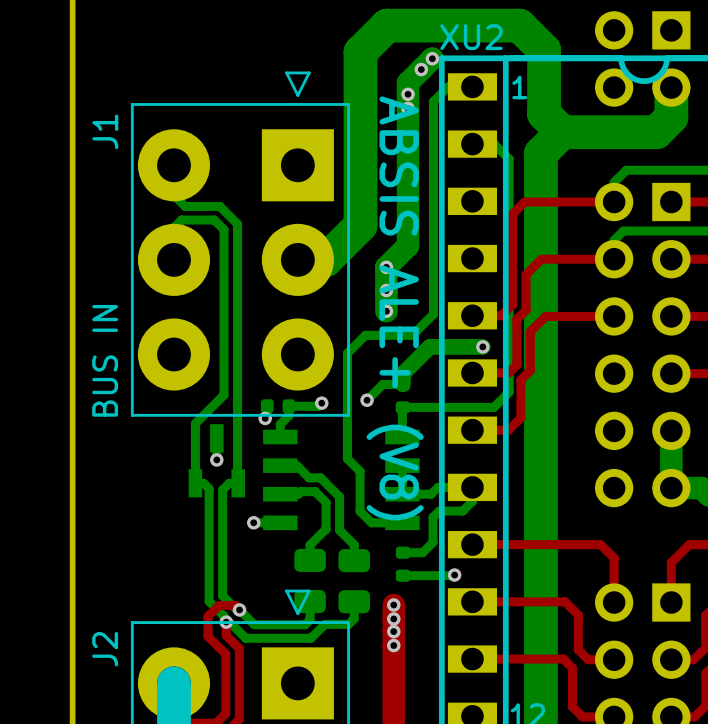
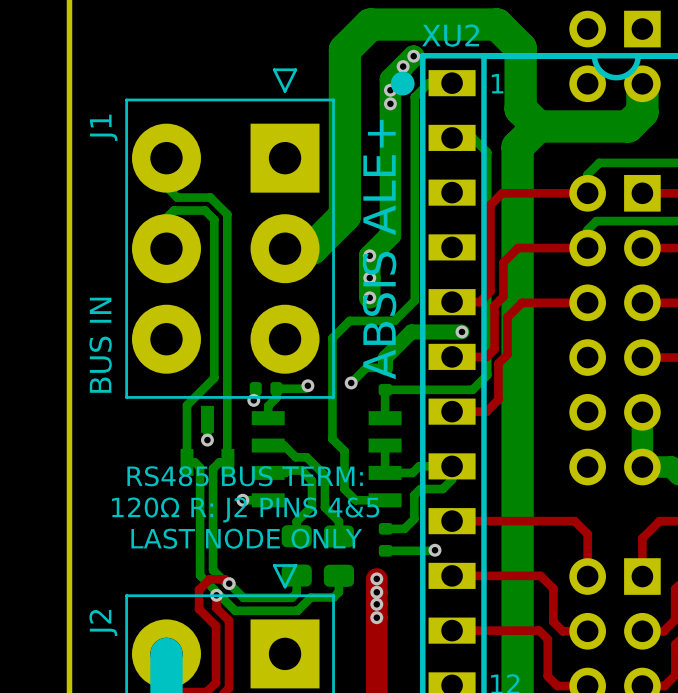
drawing: none -> [390, 71, 415, 96]
text: ABSIS ALE+ (V8) (395, 308) -> ABSIS ALE+ (379, 249)
text: none -> RS485 BUS TERM: (245, 476)
text: none -> 120Ω R: J2 PINS 4&5 (245, 509)
text: none -> LAST NODE ONLY (246, 538)

